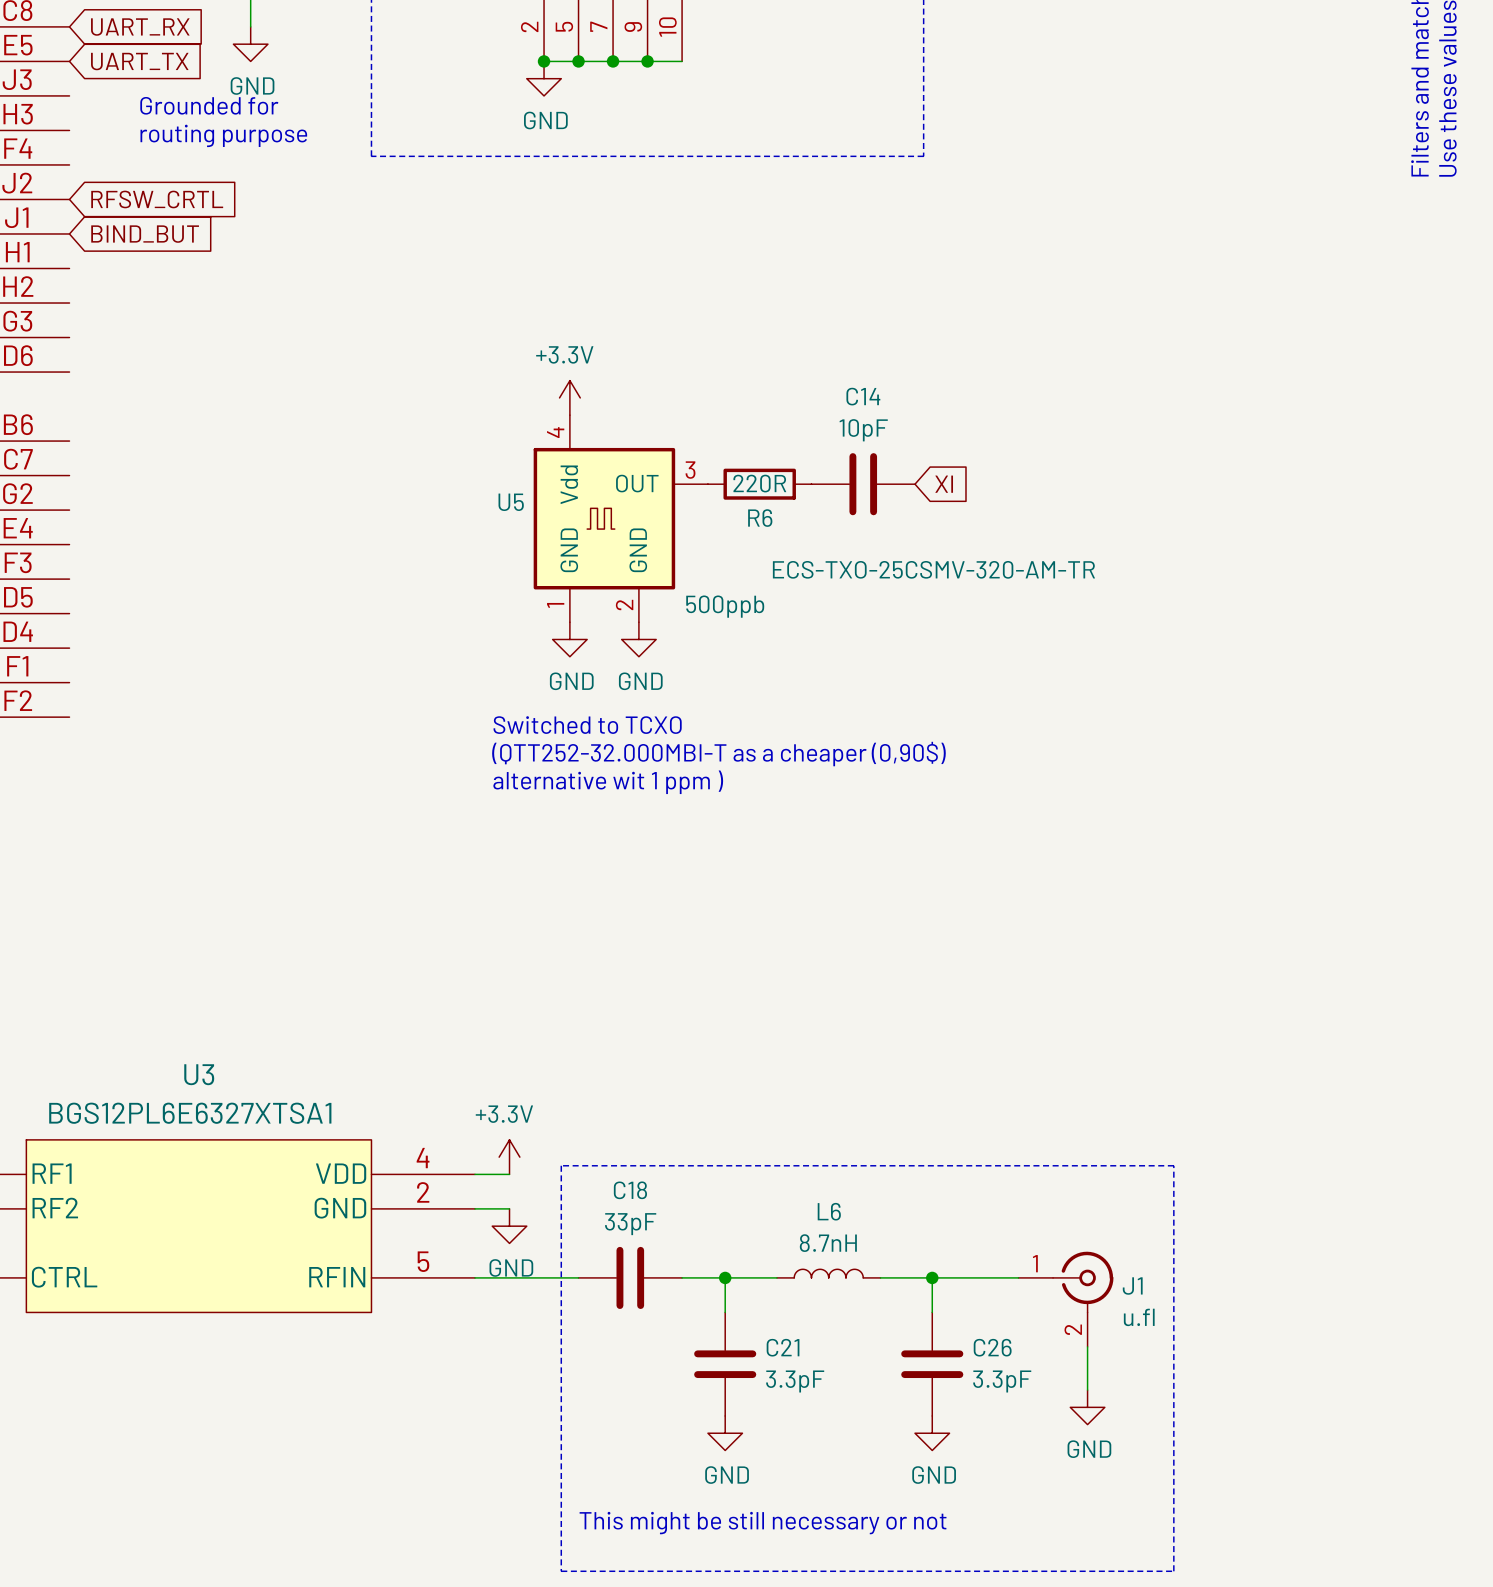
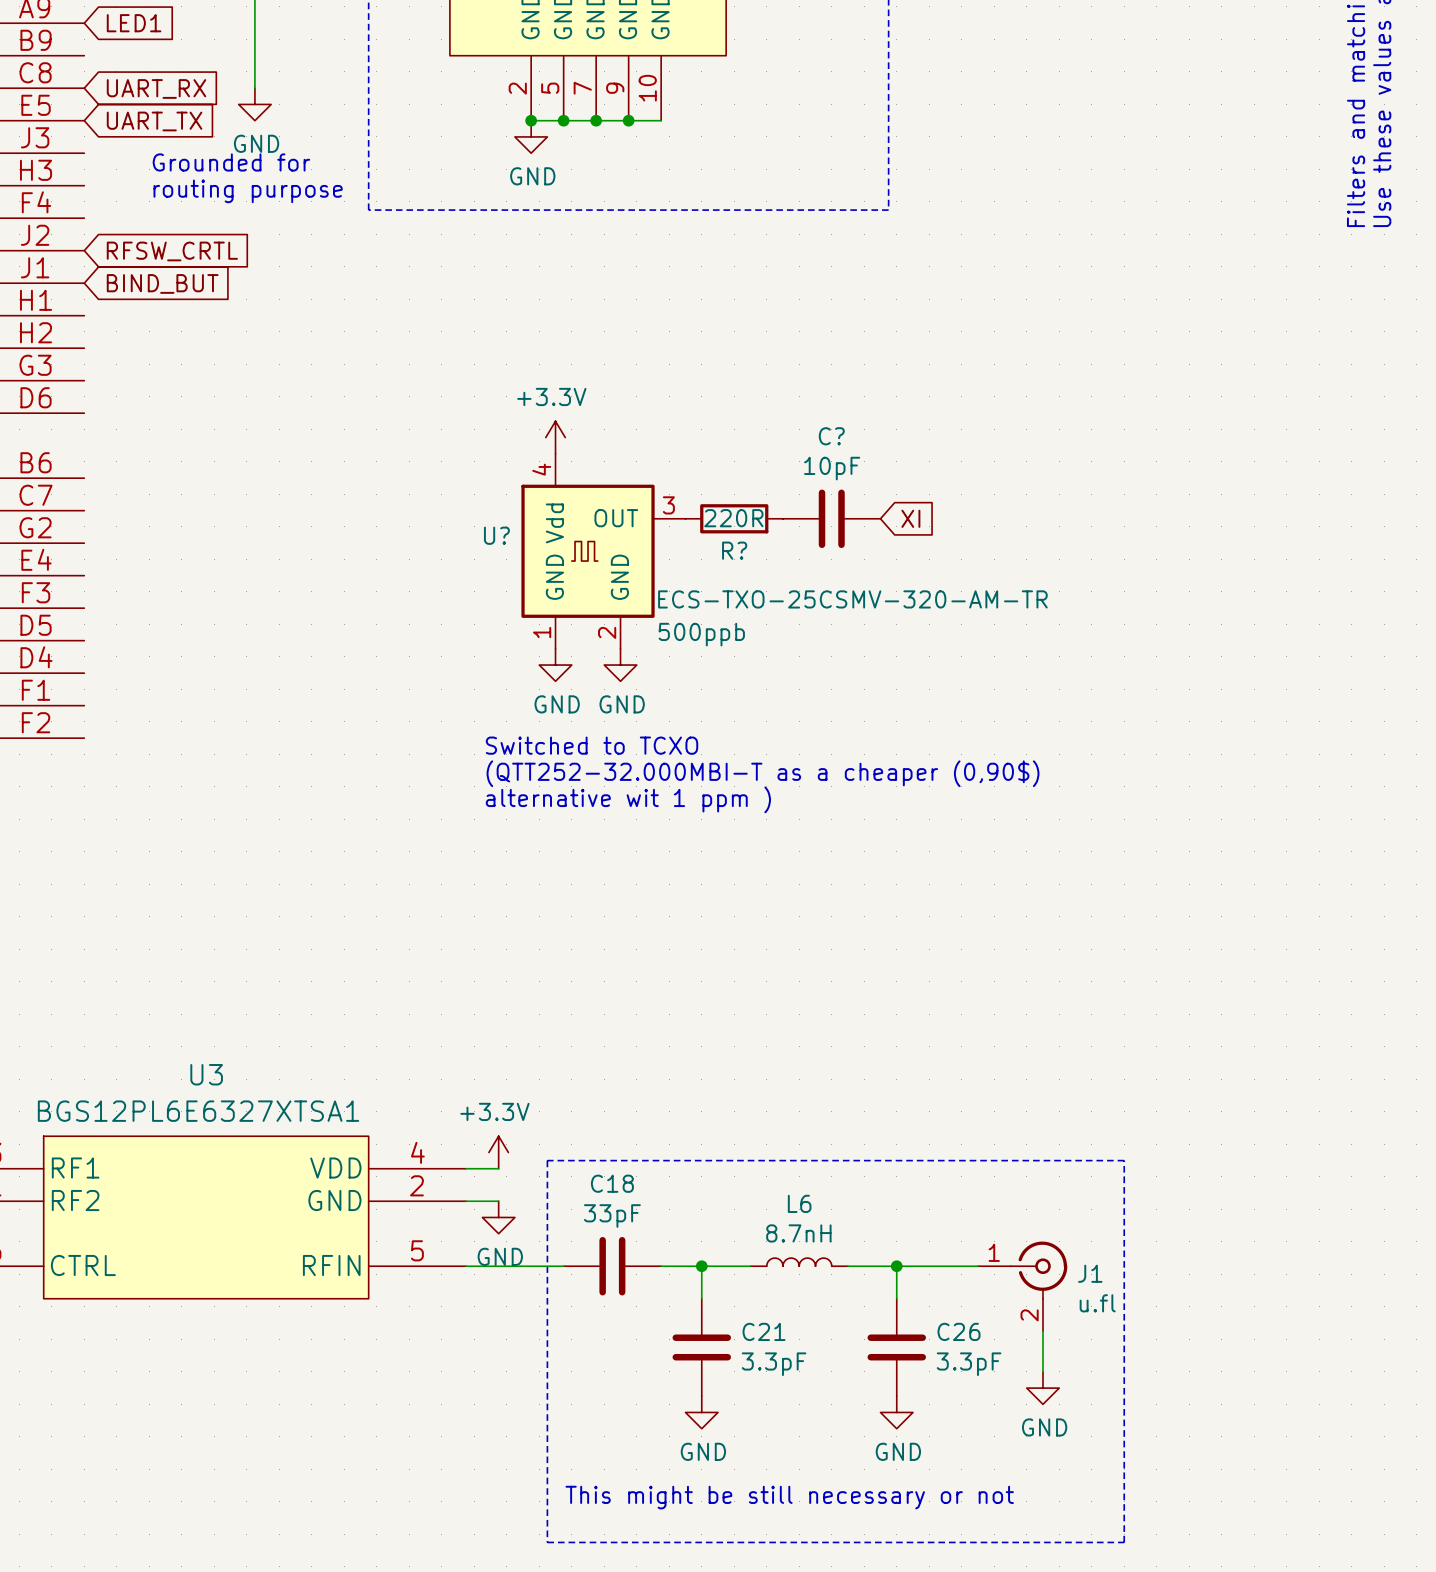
C14 name: C14 (863, 396) -> C? (831, 436)
U5 name: U5 (511, 502) -> U? (496, 535)
R6 name: R6 (760, 518) -> R? (734, 550)

